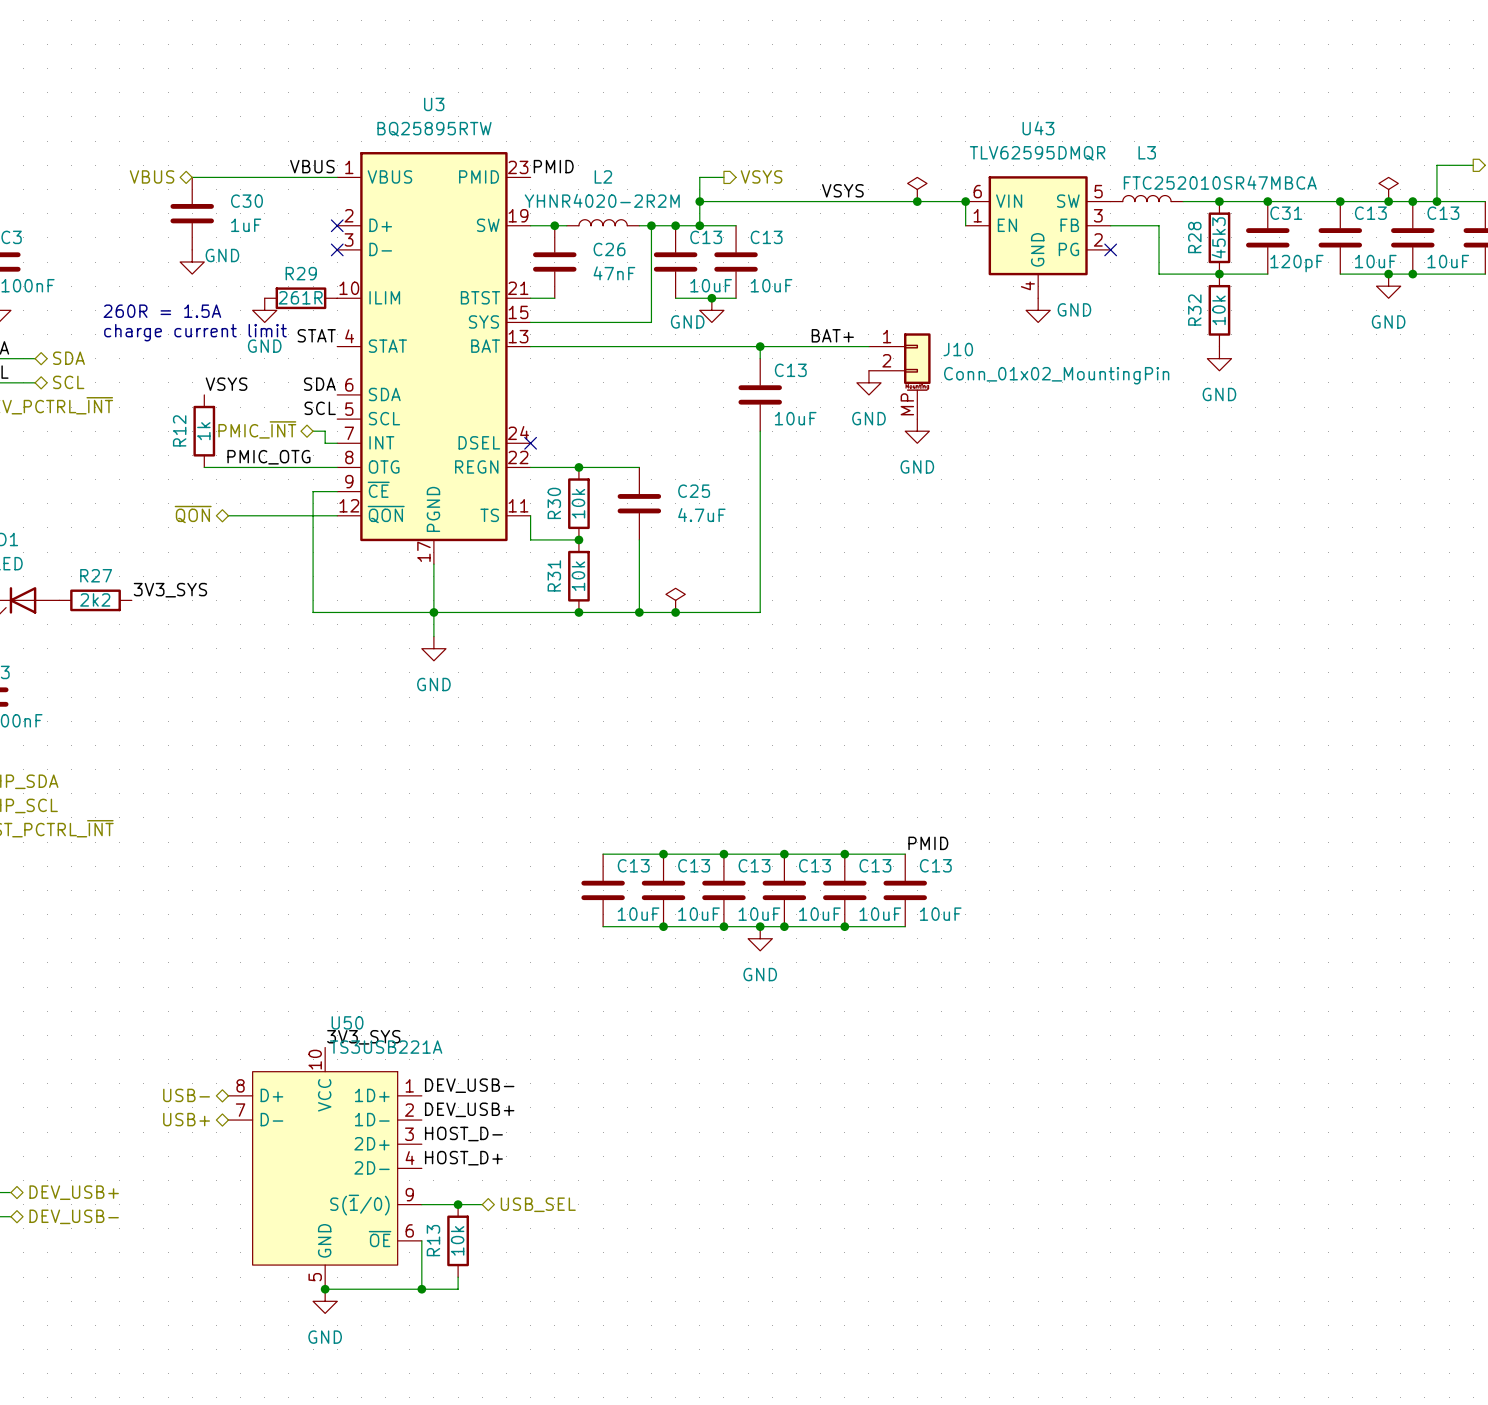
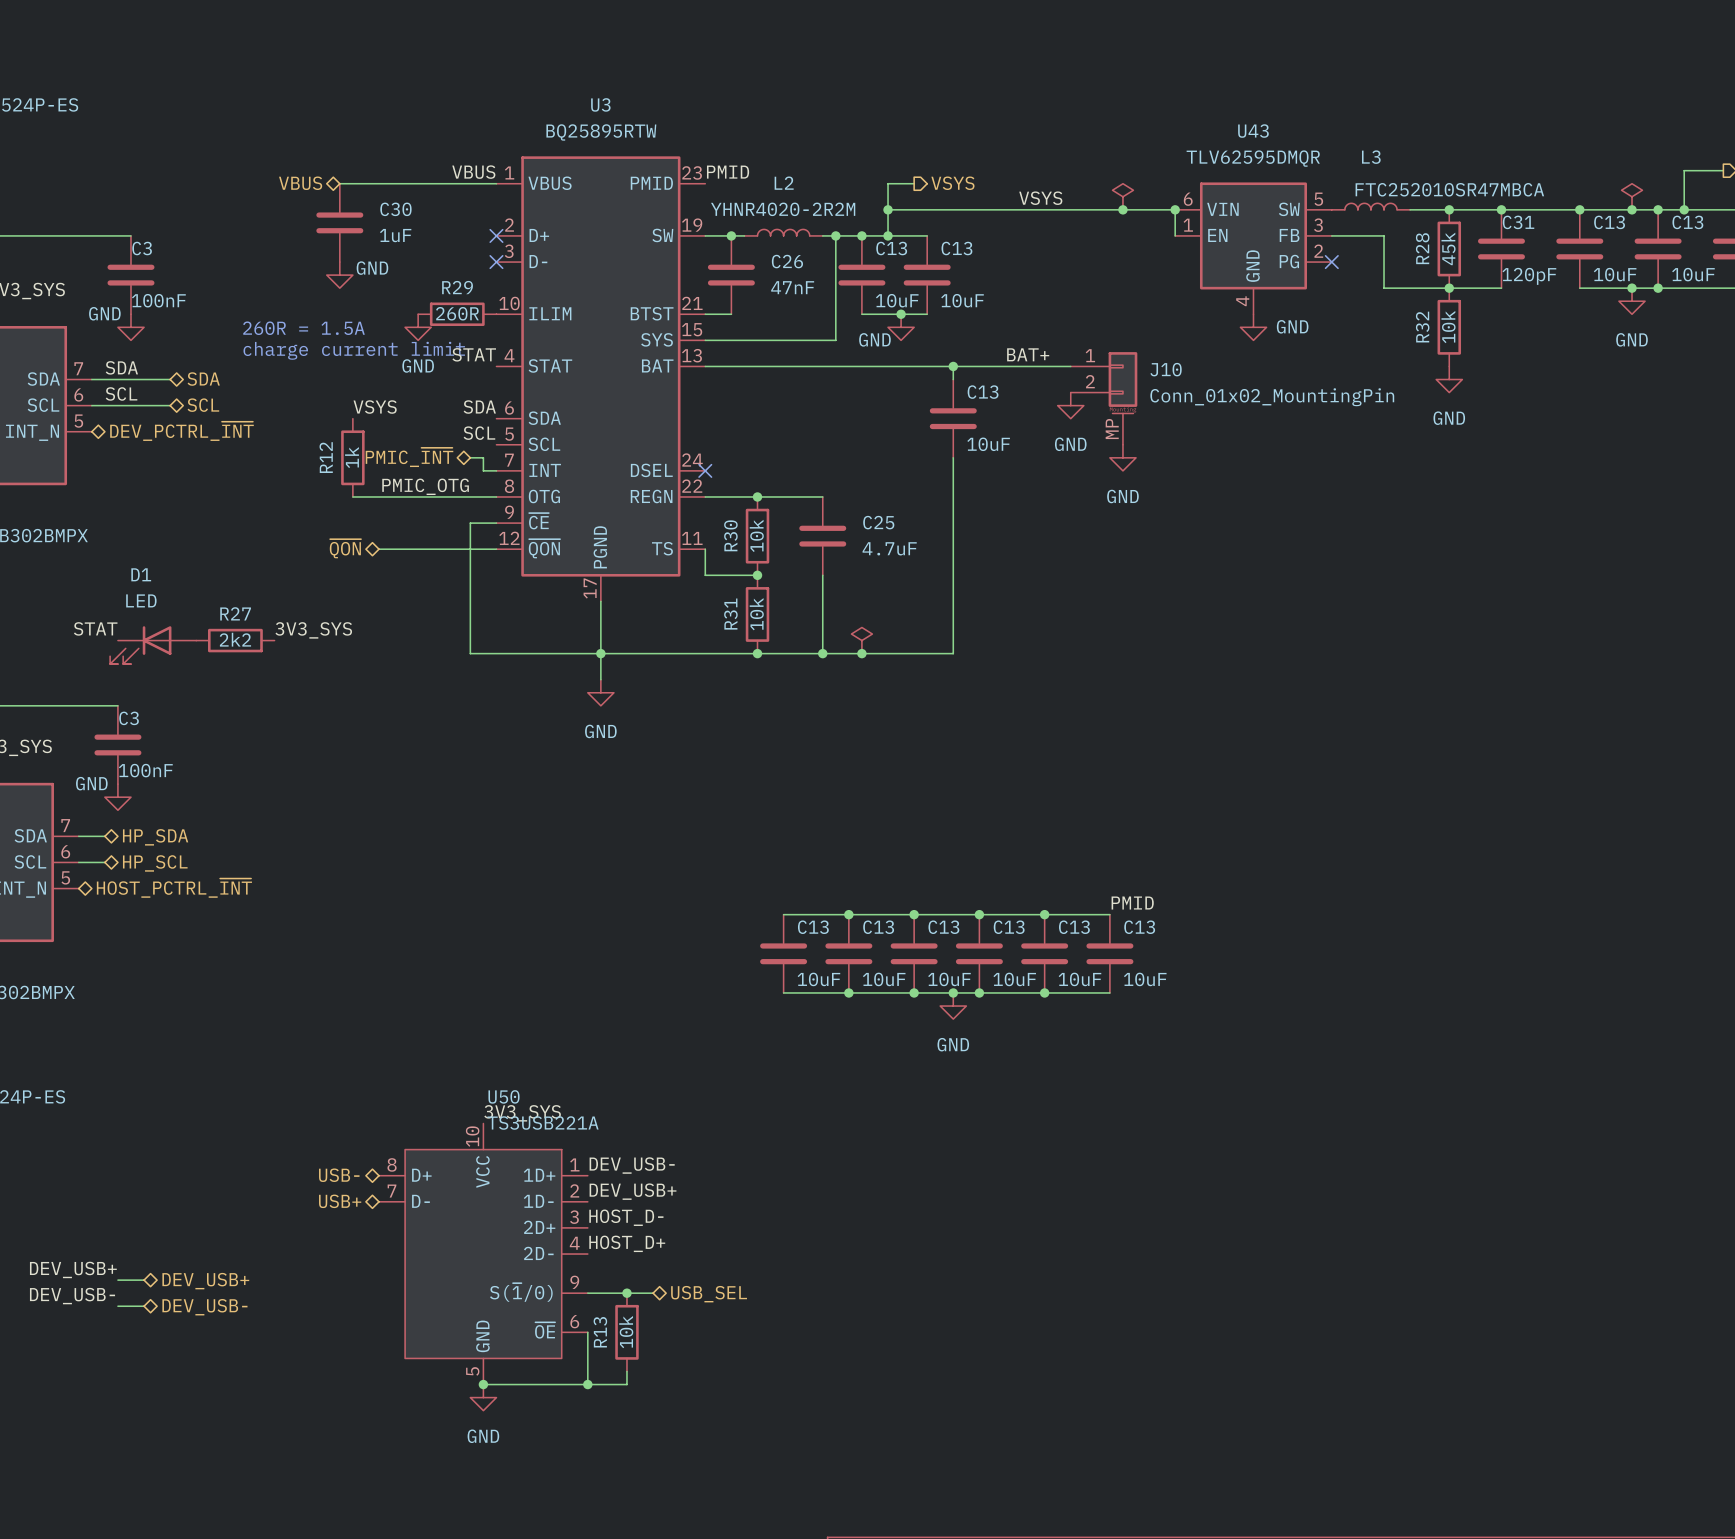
R28 value: 45k3 (1218, 237) -> 45k (1448, 248)
R29 value: 261R (300, 297) -> 260R (457, 313)

